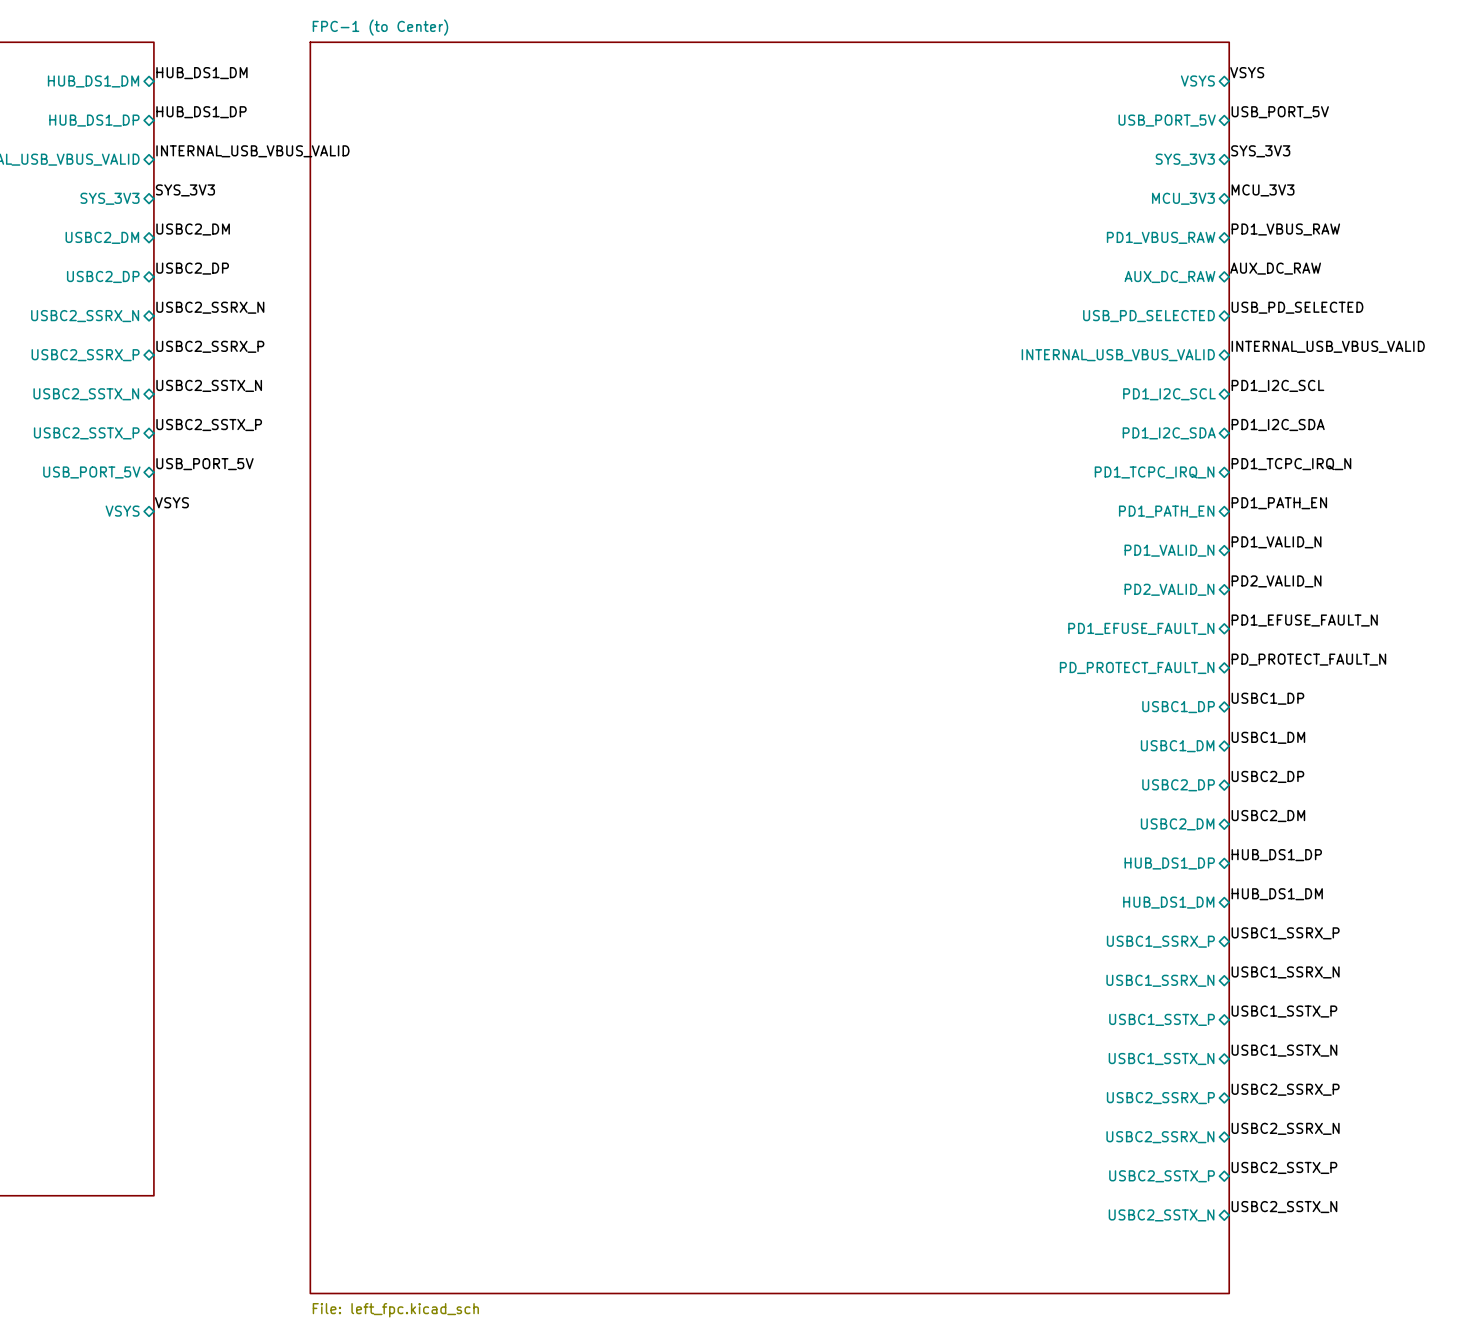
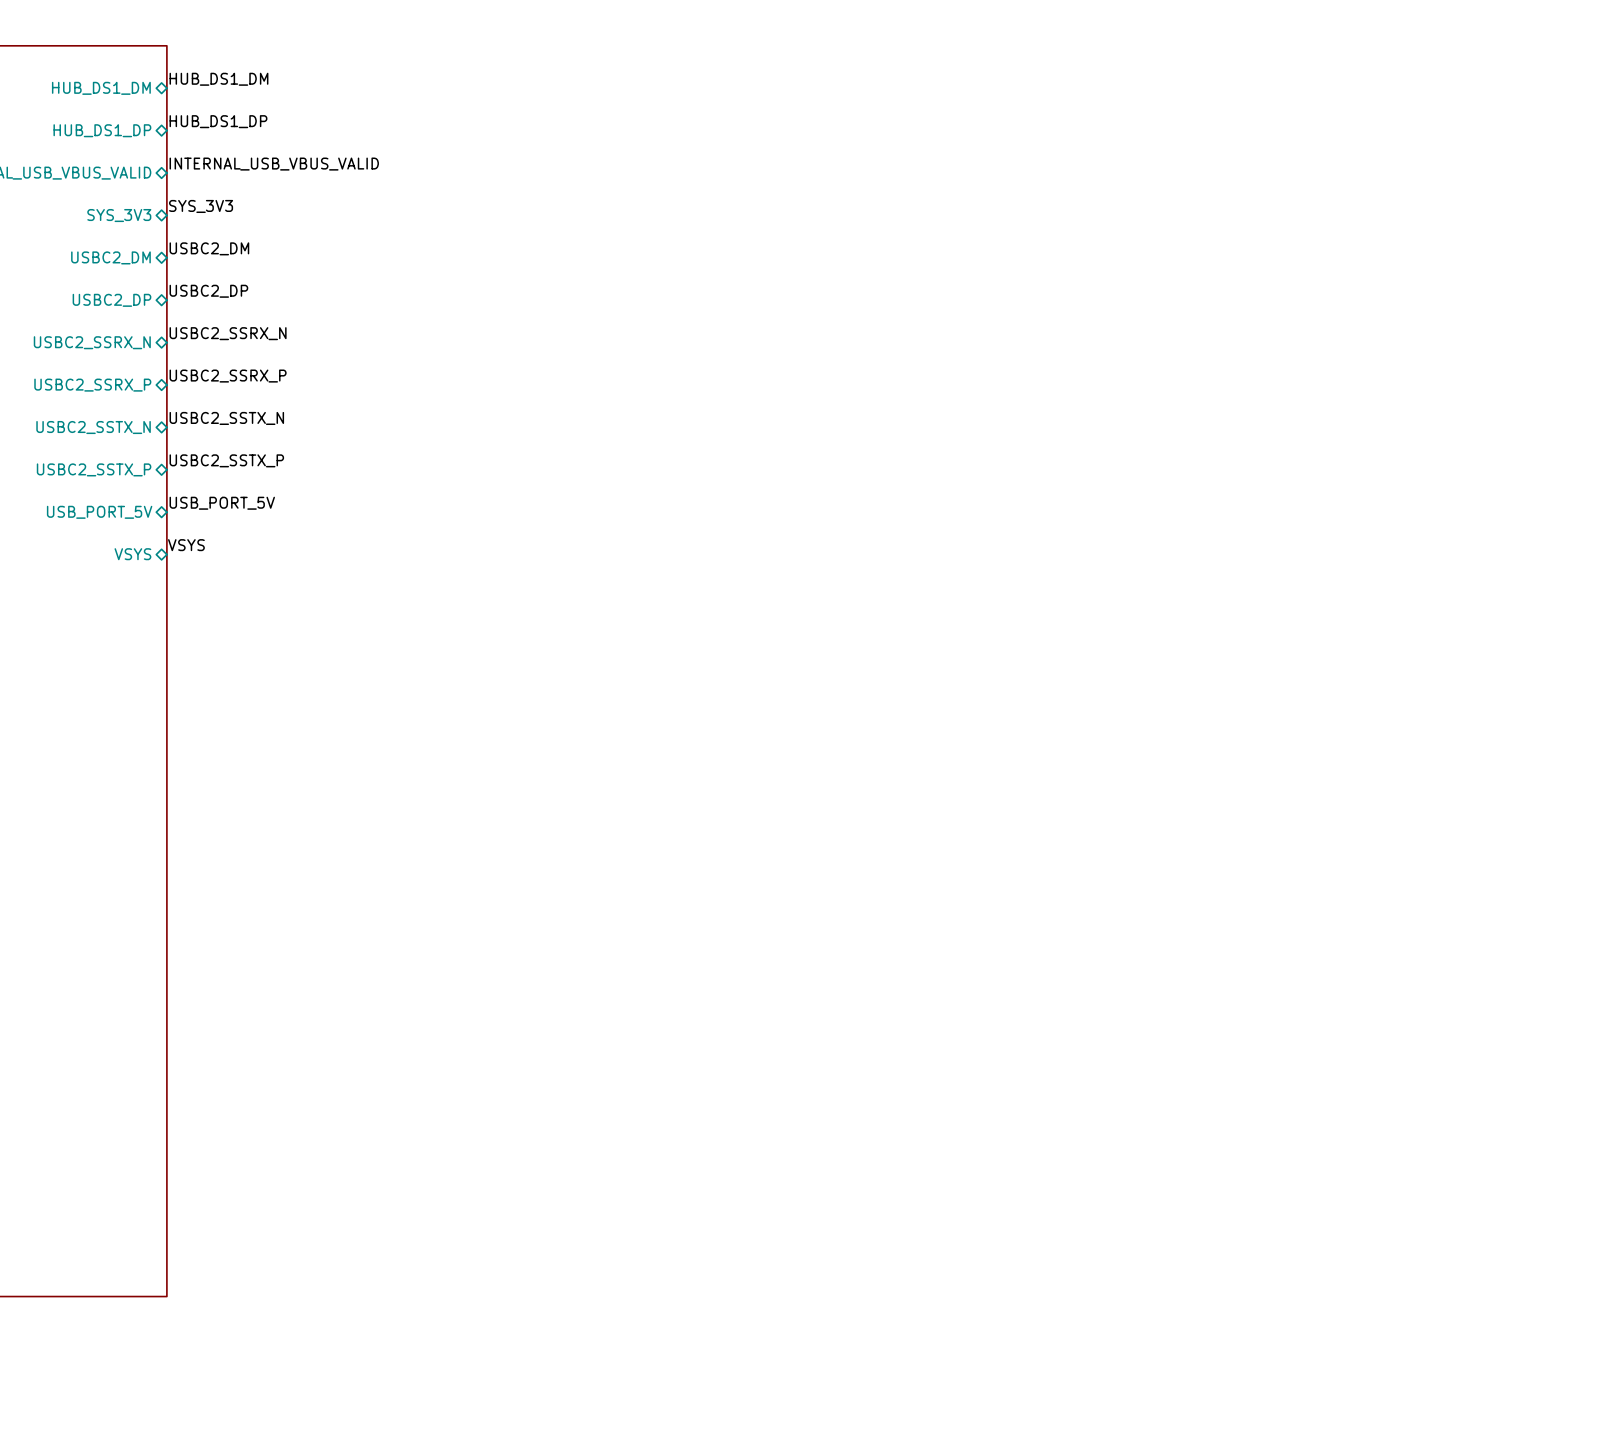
label: VSYS (1247, 72) -> none
sheet pin: VSYS (1197, 80) -> none
label: USB_PORT_5V (1280, 112) -> none
sheet pin: USB_PORT_5V (1167, 120) -> none
label: SYS_3V3 (1260, 151) -> none
sheet pin: SYS_3V3 (1185, 159) -> none
label: MCU_3V3 (1263, 190) -> none
sheet pin: MCU_3V3 (1183, 198) -> none
label: PD1_VBUS_RAW (1285, 229) -> none
sheet pin: PD1_VBUS_RAW (1161, 237) -> none
label: AUX_DC_RAW (1275, 268) -> none
sheet pin: AUX_DC_RAW (1169, 276) -> none
label: USB_PD_SELECTED (1297, 307) -> none
sheet pin: USB_PD_SELECTED (1148, 316) -> none
label: INTERNAL_USB_VBUS_VALID (1328, 346) -> none
sheet pin: INTERNAL_USB_VBUS_VALID (1118, 355) -> none
label: PD1_I2C_SCL (1277, 385) -> none
sheet pin: PD1_I2C_SCL (1169, 394) -> none
label: PD1_I2C_SDA (1278, 425) -> none
sheet pin: PD1_I2C_SDA (1169, 433) -> none
label: PD1_TCPC_IRQ_N (1291, 464) -> none
sheet pin: PD1_TCPC_IRQ_N (1154, 472) -> none
label: PD1_PATH_EN (1279, 503) -> none
sheet pin: PD1_PATH_EN (1166, 511) -> none
label: PD1_VALID_N (1276, 542) -> none
sheet pin: PD1_VALID_N (1169, 550) -> none
label: PD2_VALID_N (1276, 581) -> none
sheet pin: PD2_VALID_N (1169, 589) -> none
label: PD1_EFUSE_FAULT_N (1304, 620) -> none
sheet pin: PD1_EFUSE_FAULT_N (1141, 628) -> none
label: PD_PROTECT_FAULT_N (1308, 659) -> none
sheet FPC-1 (to Center): File: left_fpc.kicad_sch (769, 667) -> none
sheet pin: PD_PROTECT_FAULT_N (1137, 667) -> none
label: USBC1_DP (1267, 698) -> none
sheet pin: USBC1_DP (1178, 707) -> none
label: USBC1_DM (1268, 737) -> none
sheet pin: USBC1_DM (1177, 746) -> none
label: USBC2_DP (1267, 776) -> none
sheet pin: USBC2_DP (1178, 785) -> none
label: USBC2_DM (1268, 816) -> none
sheet pin: USBC2_DM (1177, 824) -> none
label: HUB_DS1_DP (1276, 855) -> none
sheet pin: HUB_DS1_DP (1169, 863) -> none
label: HUB_DS1_DM (1277, 894) -> none
sheet pin: HUB_DS1_DM (1168, 902) -> none
label: USBC1_SSRX_P (1285, 933) -> none
sheet pin: USBC1_SSRX_P (1160, 941) -> none
label: USBC1_SSRX_N (1285, 972) -> none
sheet pin: USBC1_SSRX_N (1160, 980) -> none
label: USBC1_SSTX_P (1284, 1011) -> none
sheet pin: USBC1_SSTX_P (1162, 1019) -> none
label: USBC1_SSTX_N (1284, 1050) -> none
sheet pin: USBC1_SSTX_N (1161, 1058) -> none
label: USBC2_SSRX_P (1285, 1089) -> none
sheet pin: USBC2_SSRX_P (1160, 1098) -> none
label: USBC2_SSRX_N (1285, 1128) -> none
sheet pin: USBC2_SSRX_N (1160, 1137) -> none
label: USBC2_SSTX_P (1284, 1167) -> none
sheet pin: USBC2_SSTX_P (1162, 1176) -> none
label: USBC2_SSTX_N (1284, 1207) -> none
sheet pin: USBC2_SSTX_N (1161, 1215) -> none

